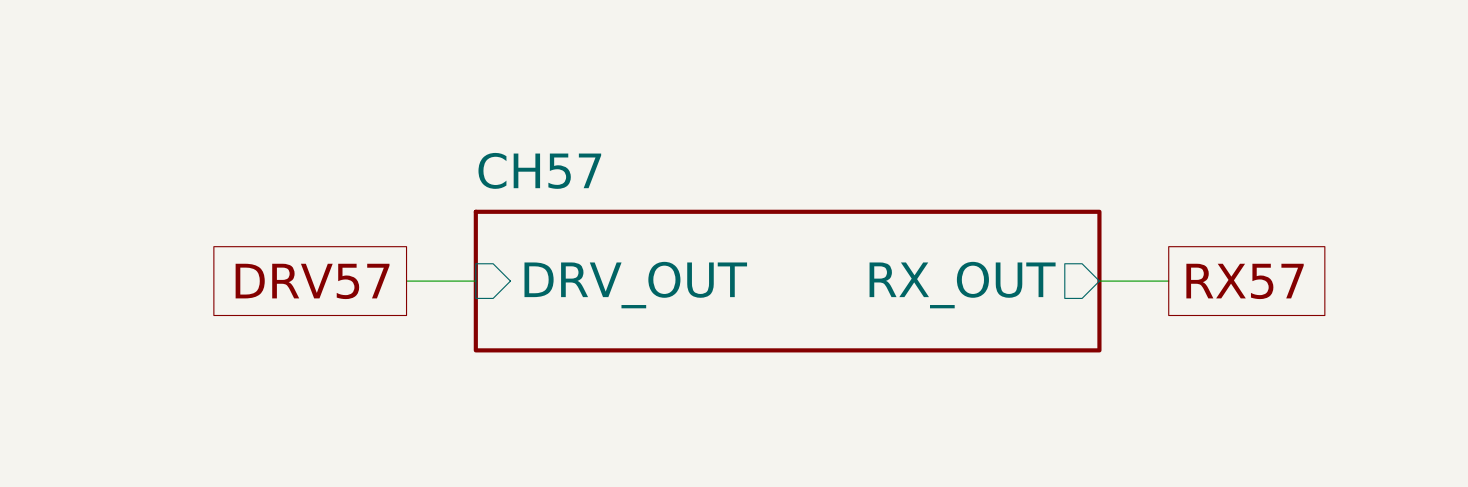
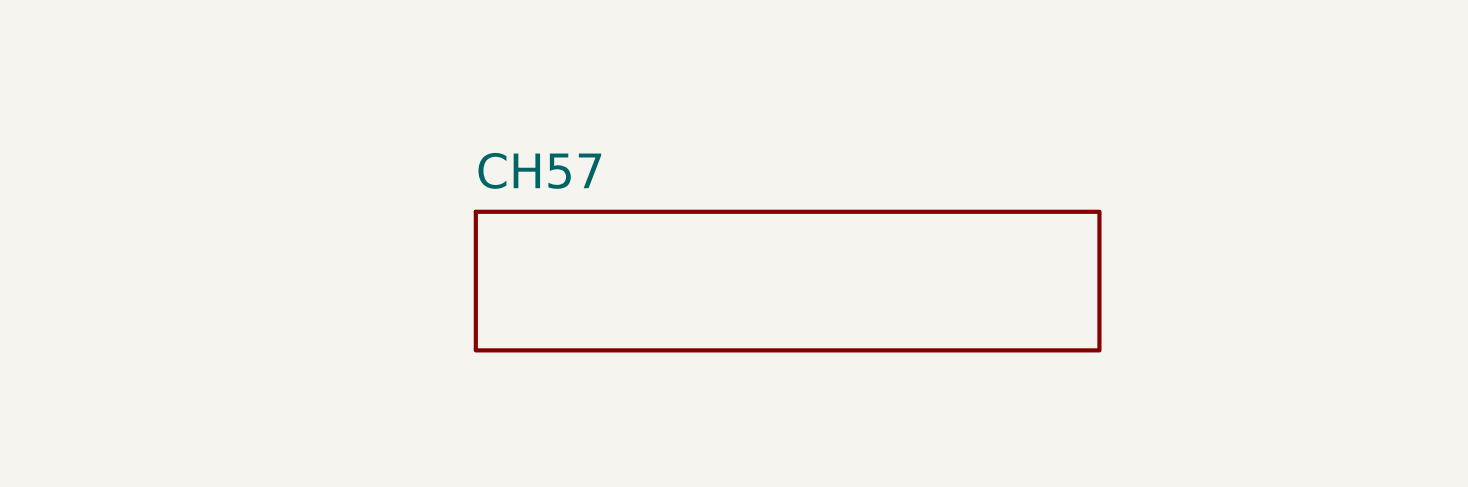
global label: DRV57 (312, 281) -> none
wire: (406, 281) (475, 281) -> none
wire: (1099, 281) (1168, 281) -> none
global label: RX57 (1245, 281) -> none
sheet pin: DRV_OUT (635, 285) -> none
sheet pin: RX_OUT (962, 285) -> none

